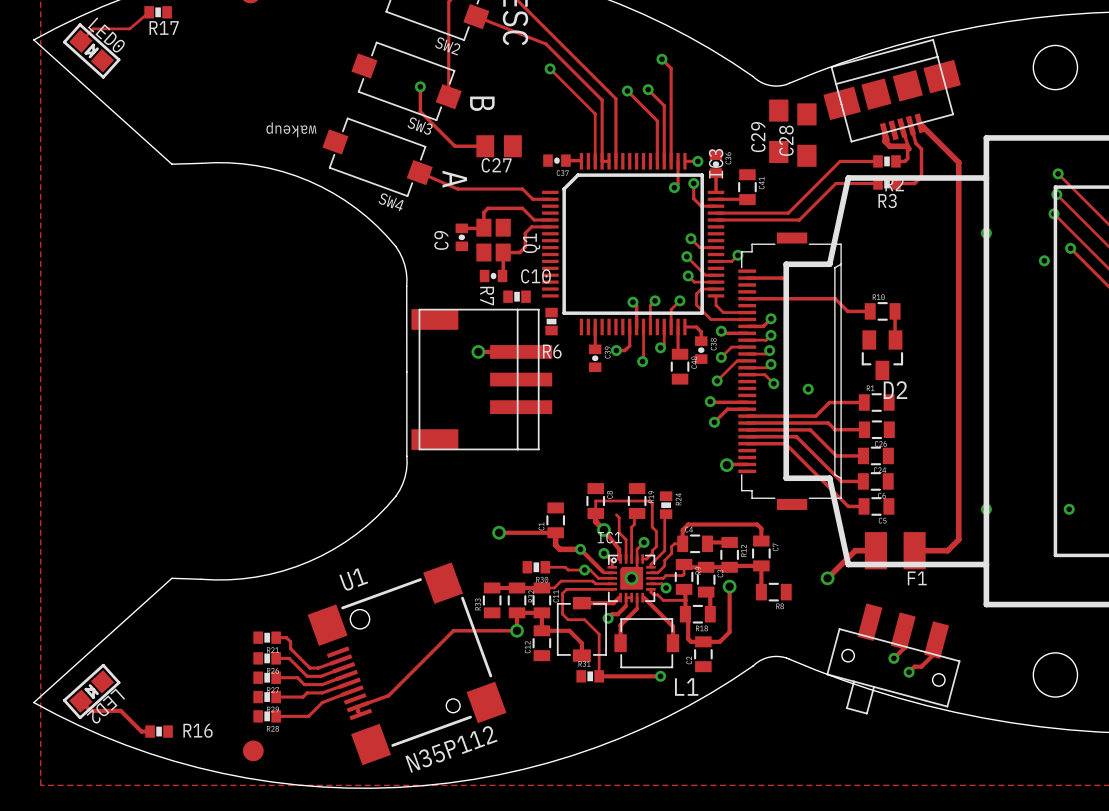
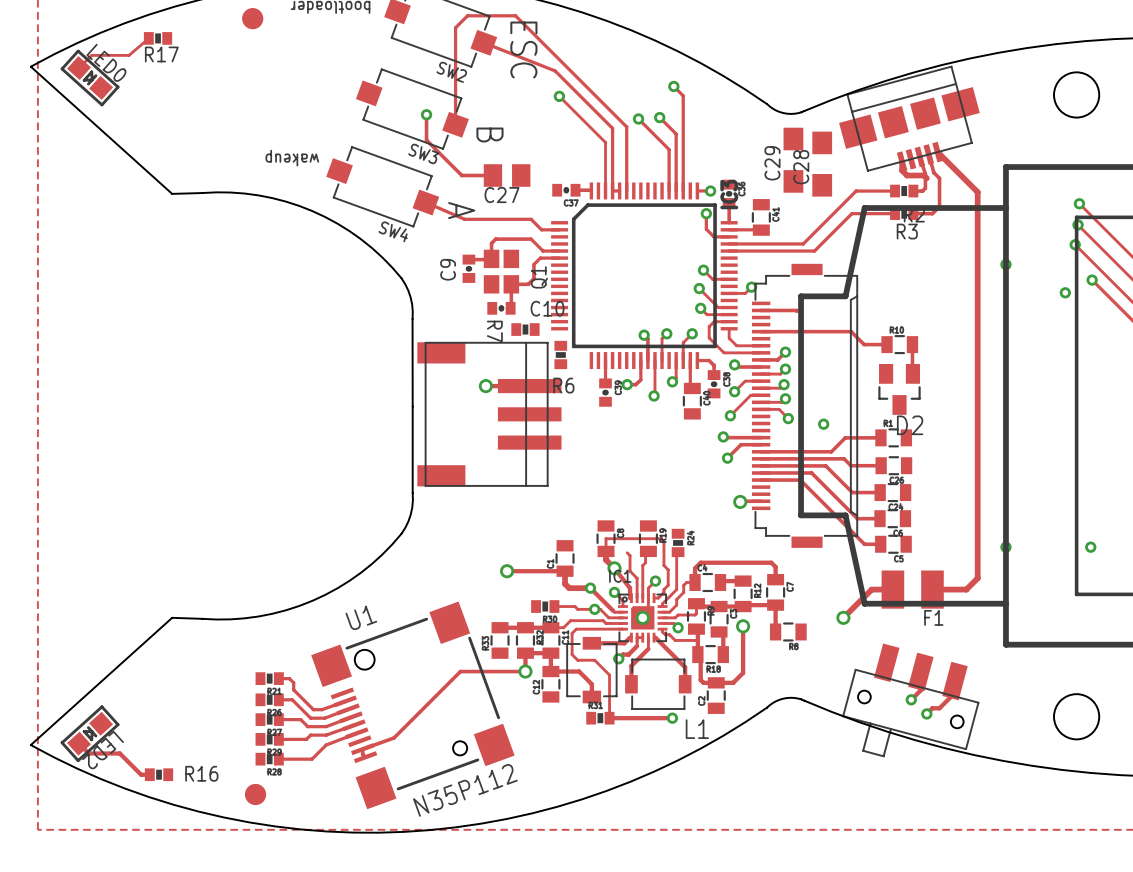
track: (678, 161) (678, 183) (674, 187) -> none
via: (674, 187) -> none

